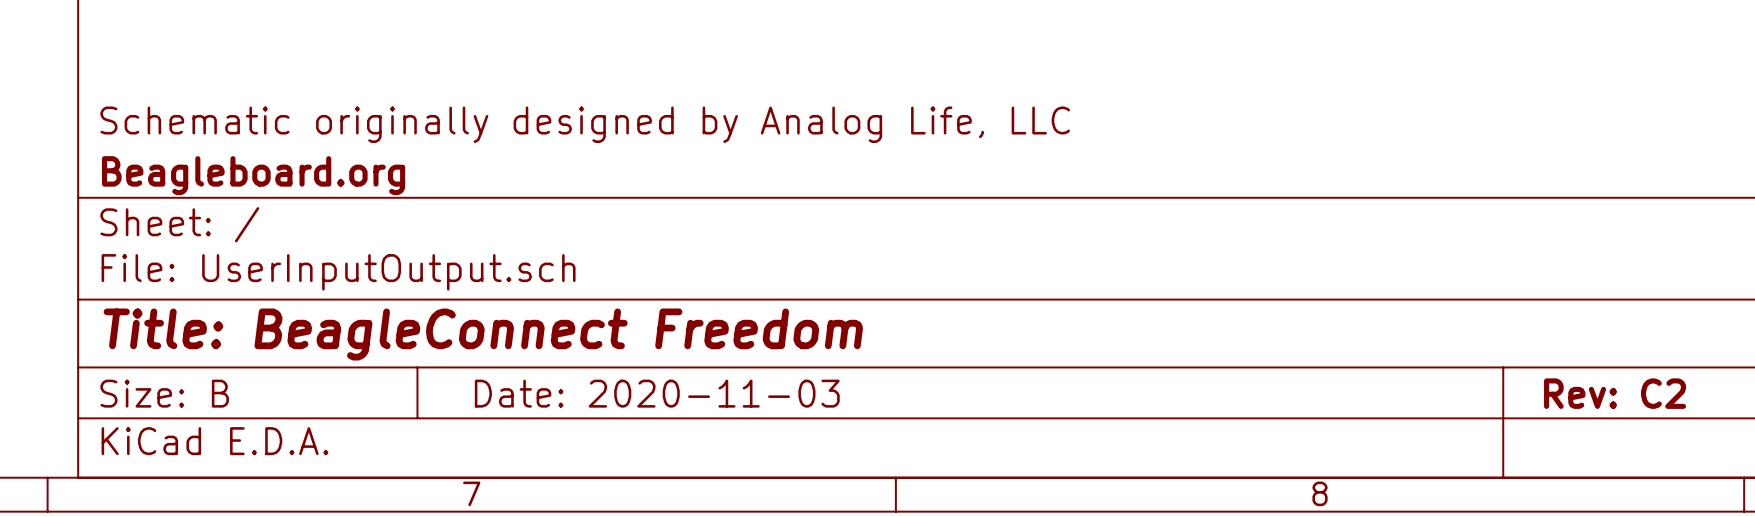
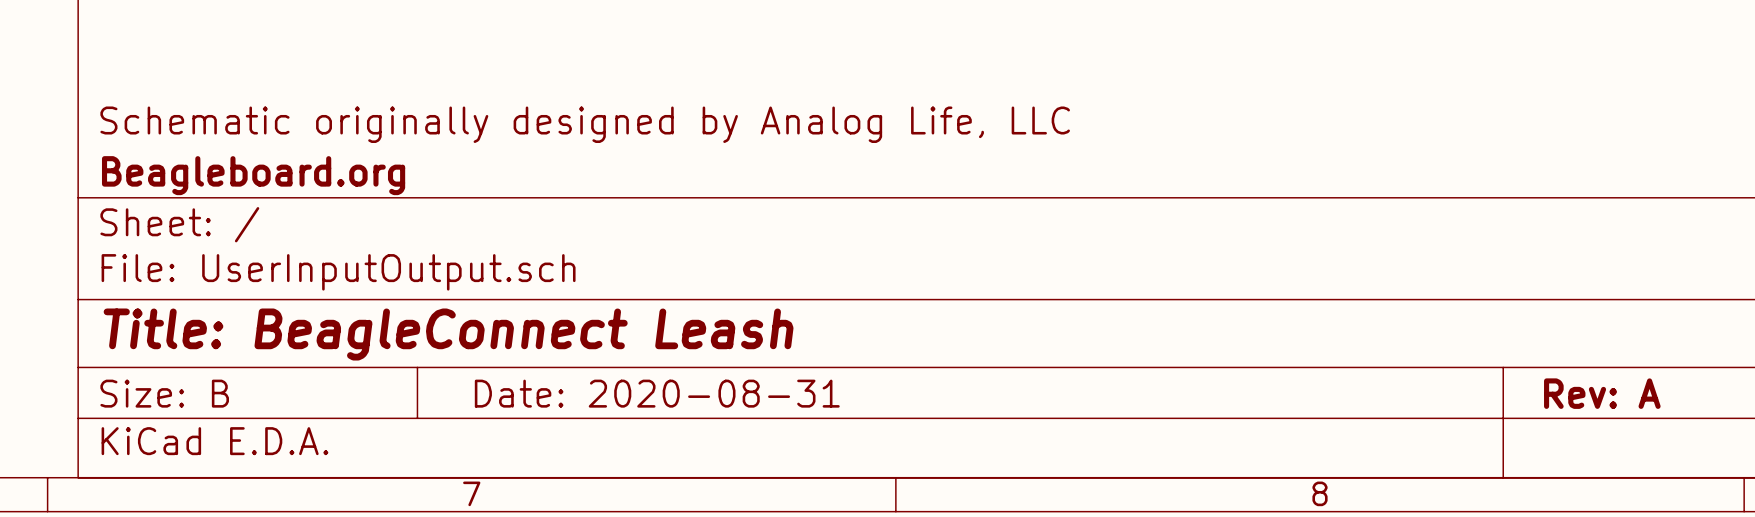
title block: Title: BeagleConnect Freedom (483, 334) -> Title: BeagleConnect Leash (448, 334)
title block: Date: 2020-11-03 (657, 393) -> Date: 2020-08-31 (657, 393)
title block: Rev: C2 (1615, 393) -> Rev: A (1602, 393)

